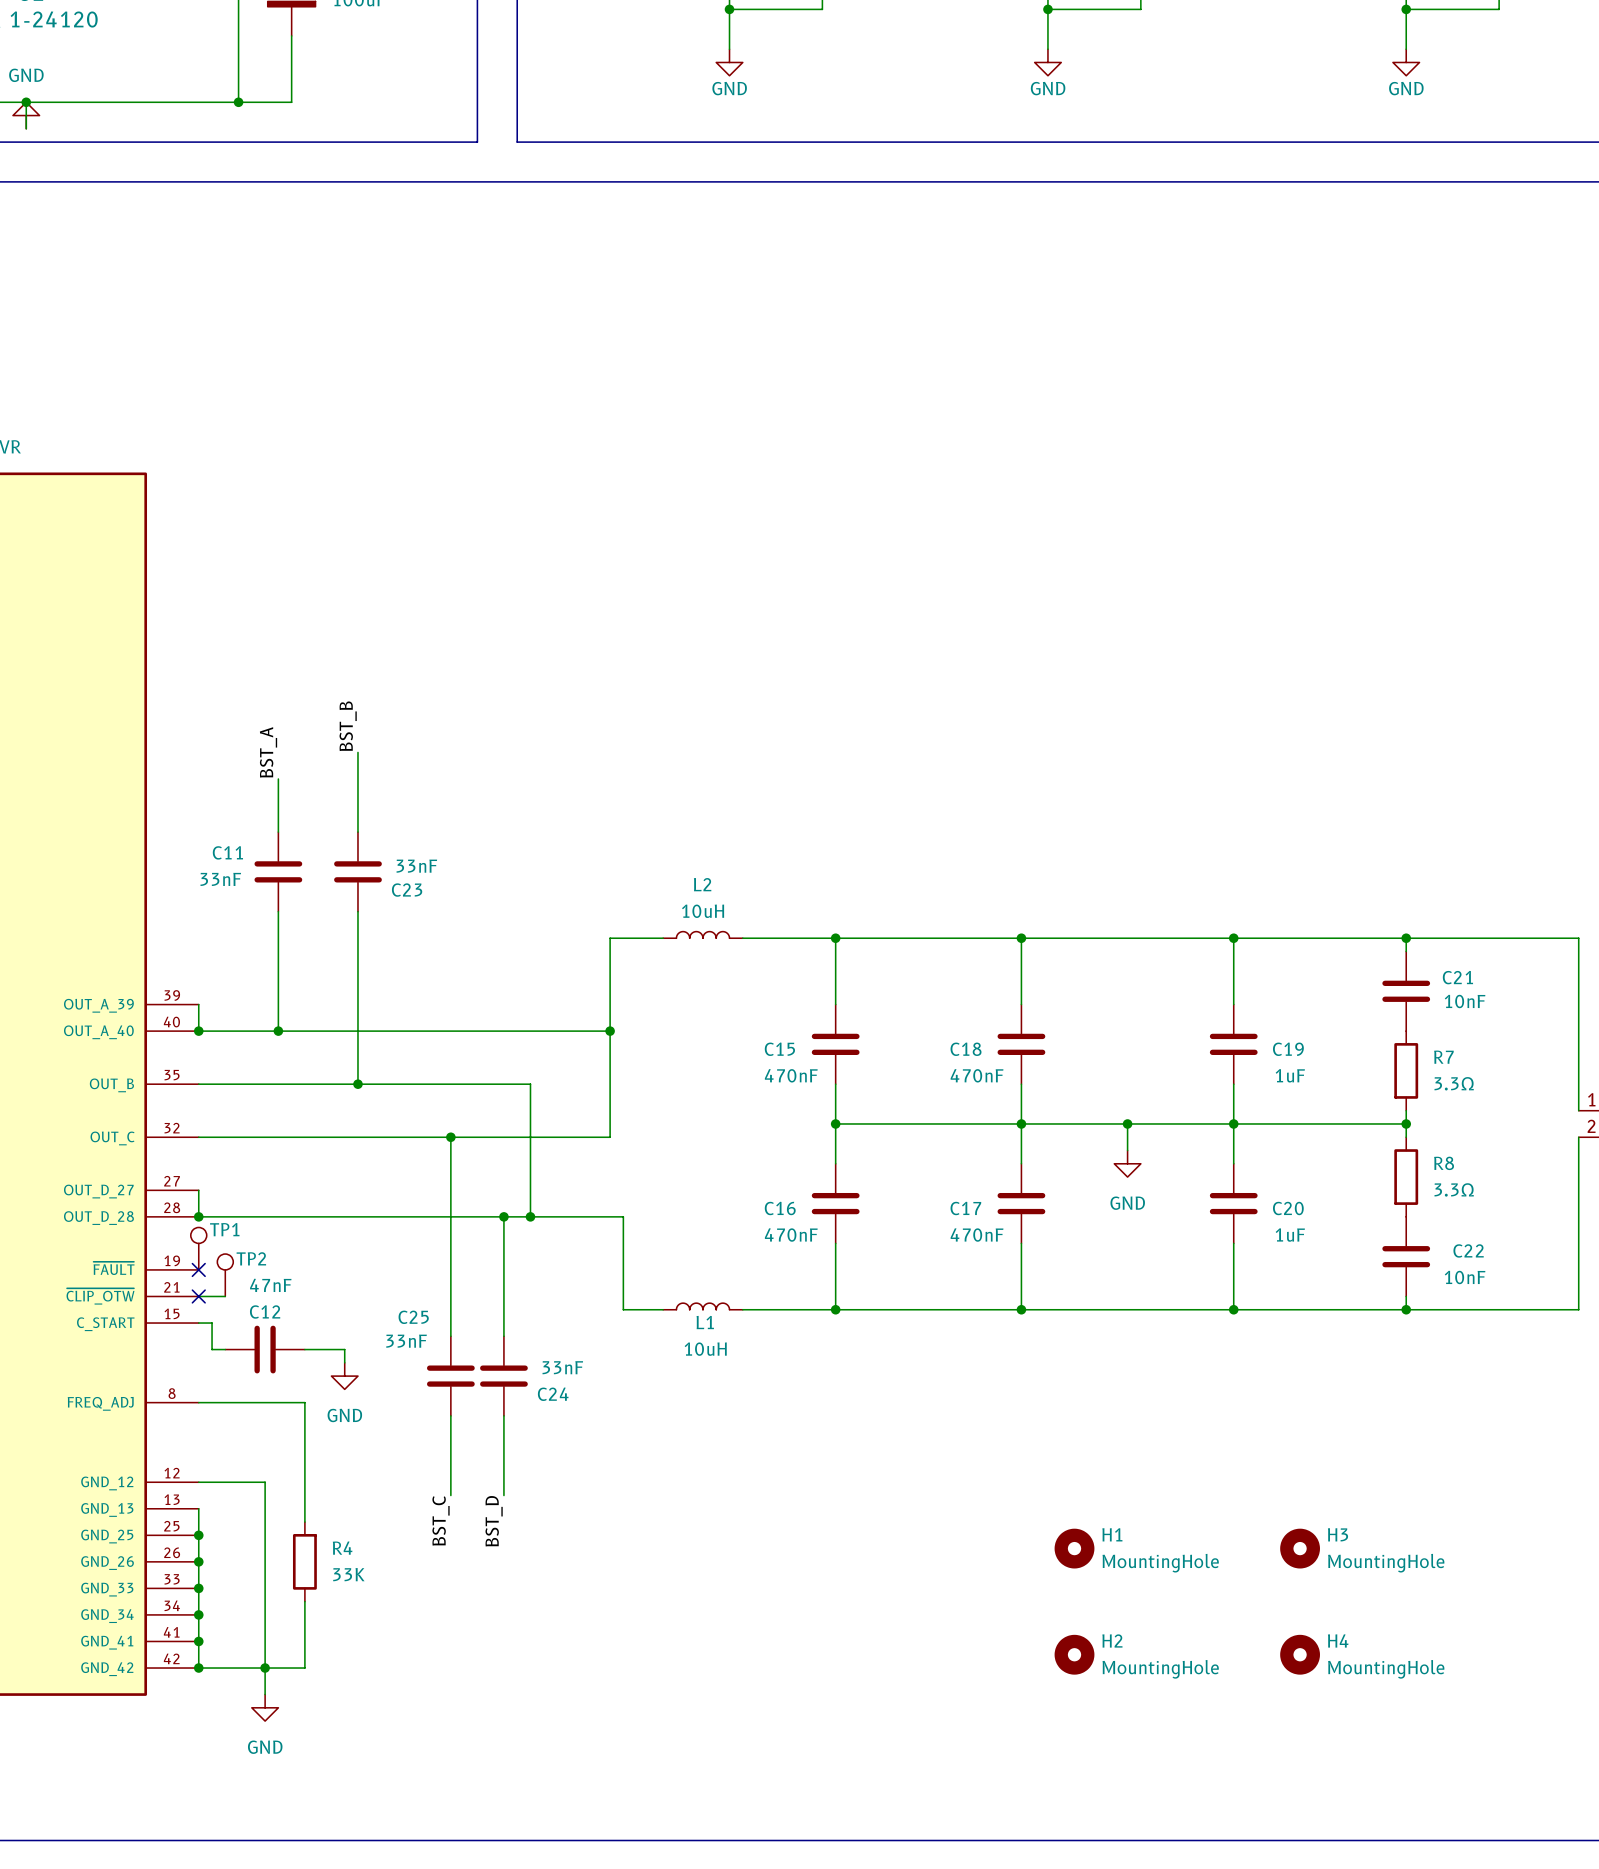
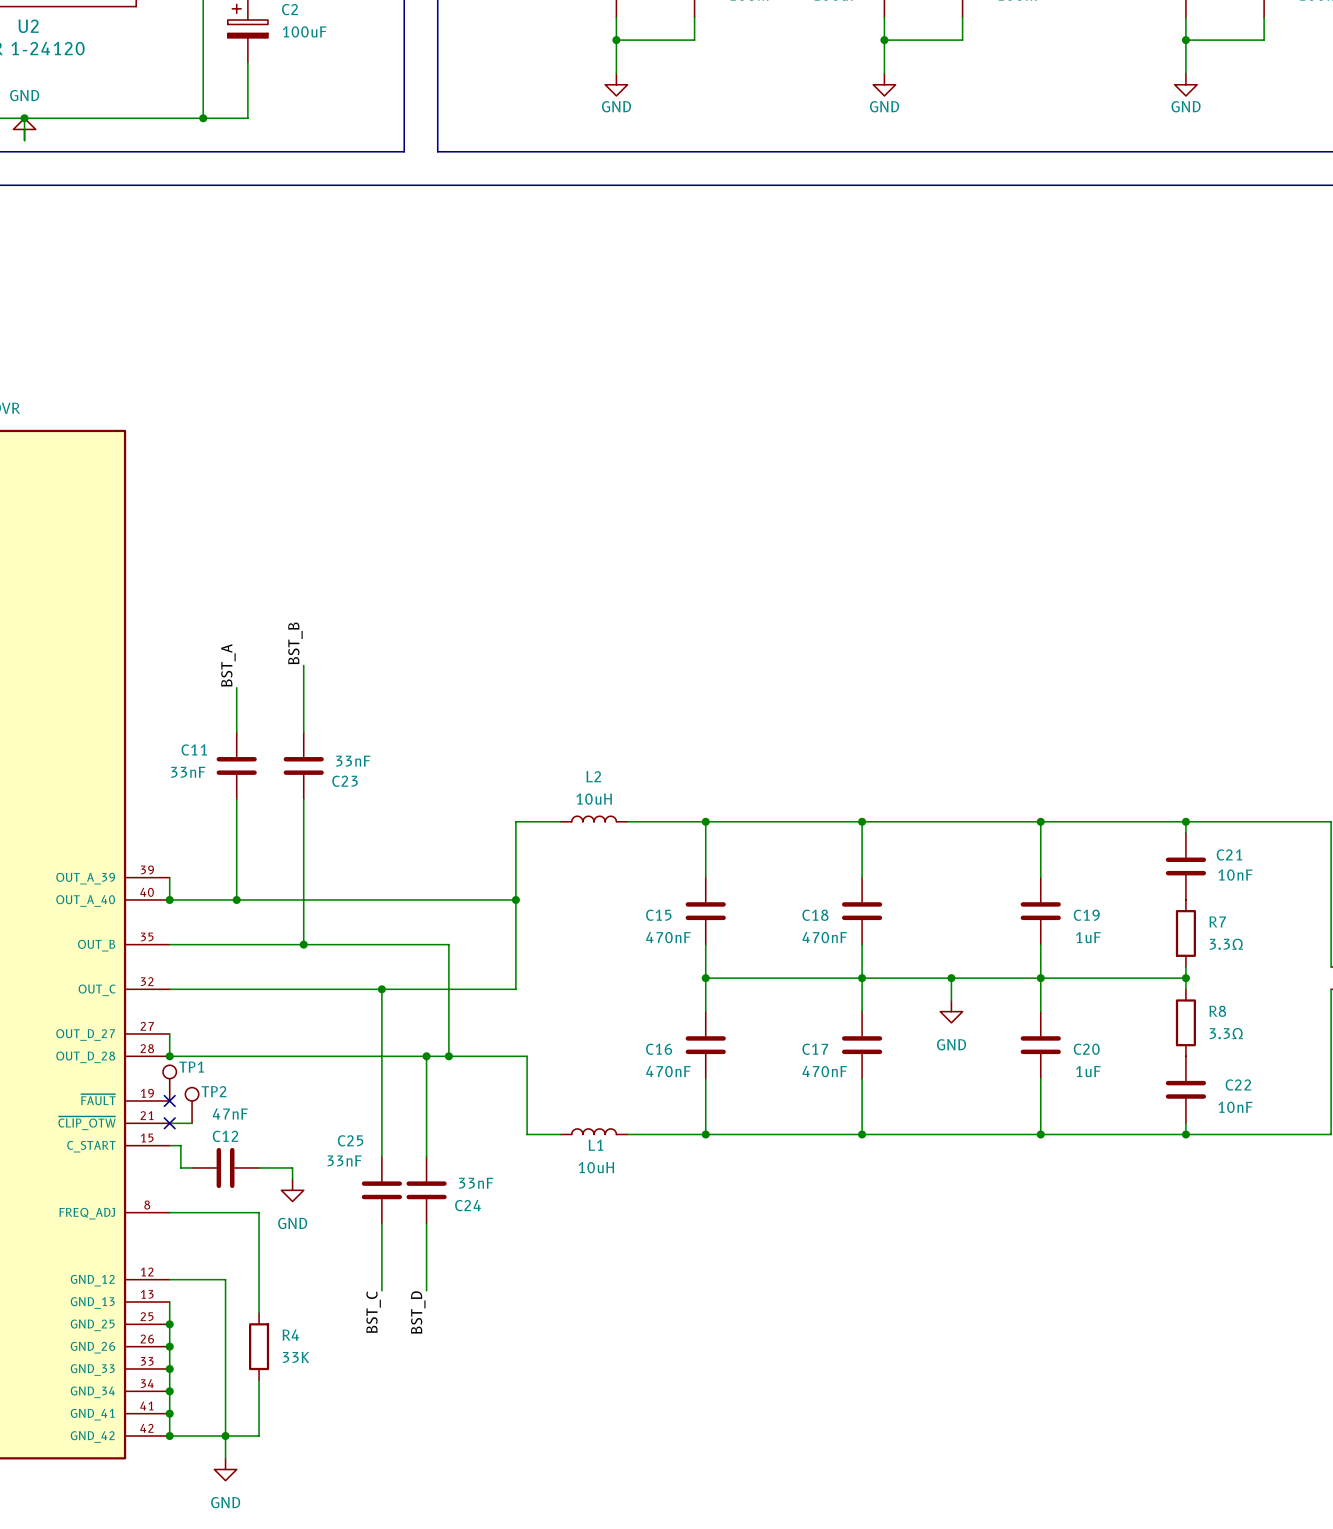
H1: MountingHole (1074, 1548) -> none
H3: MountingHole (1300, 1548) -> none
H2: MountingHole (1074, 1654) -> none
H4: MountingHole (1300, 1654) -> none

